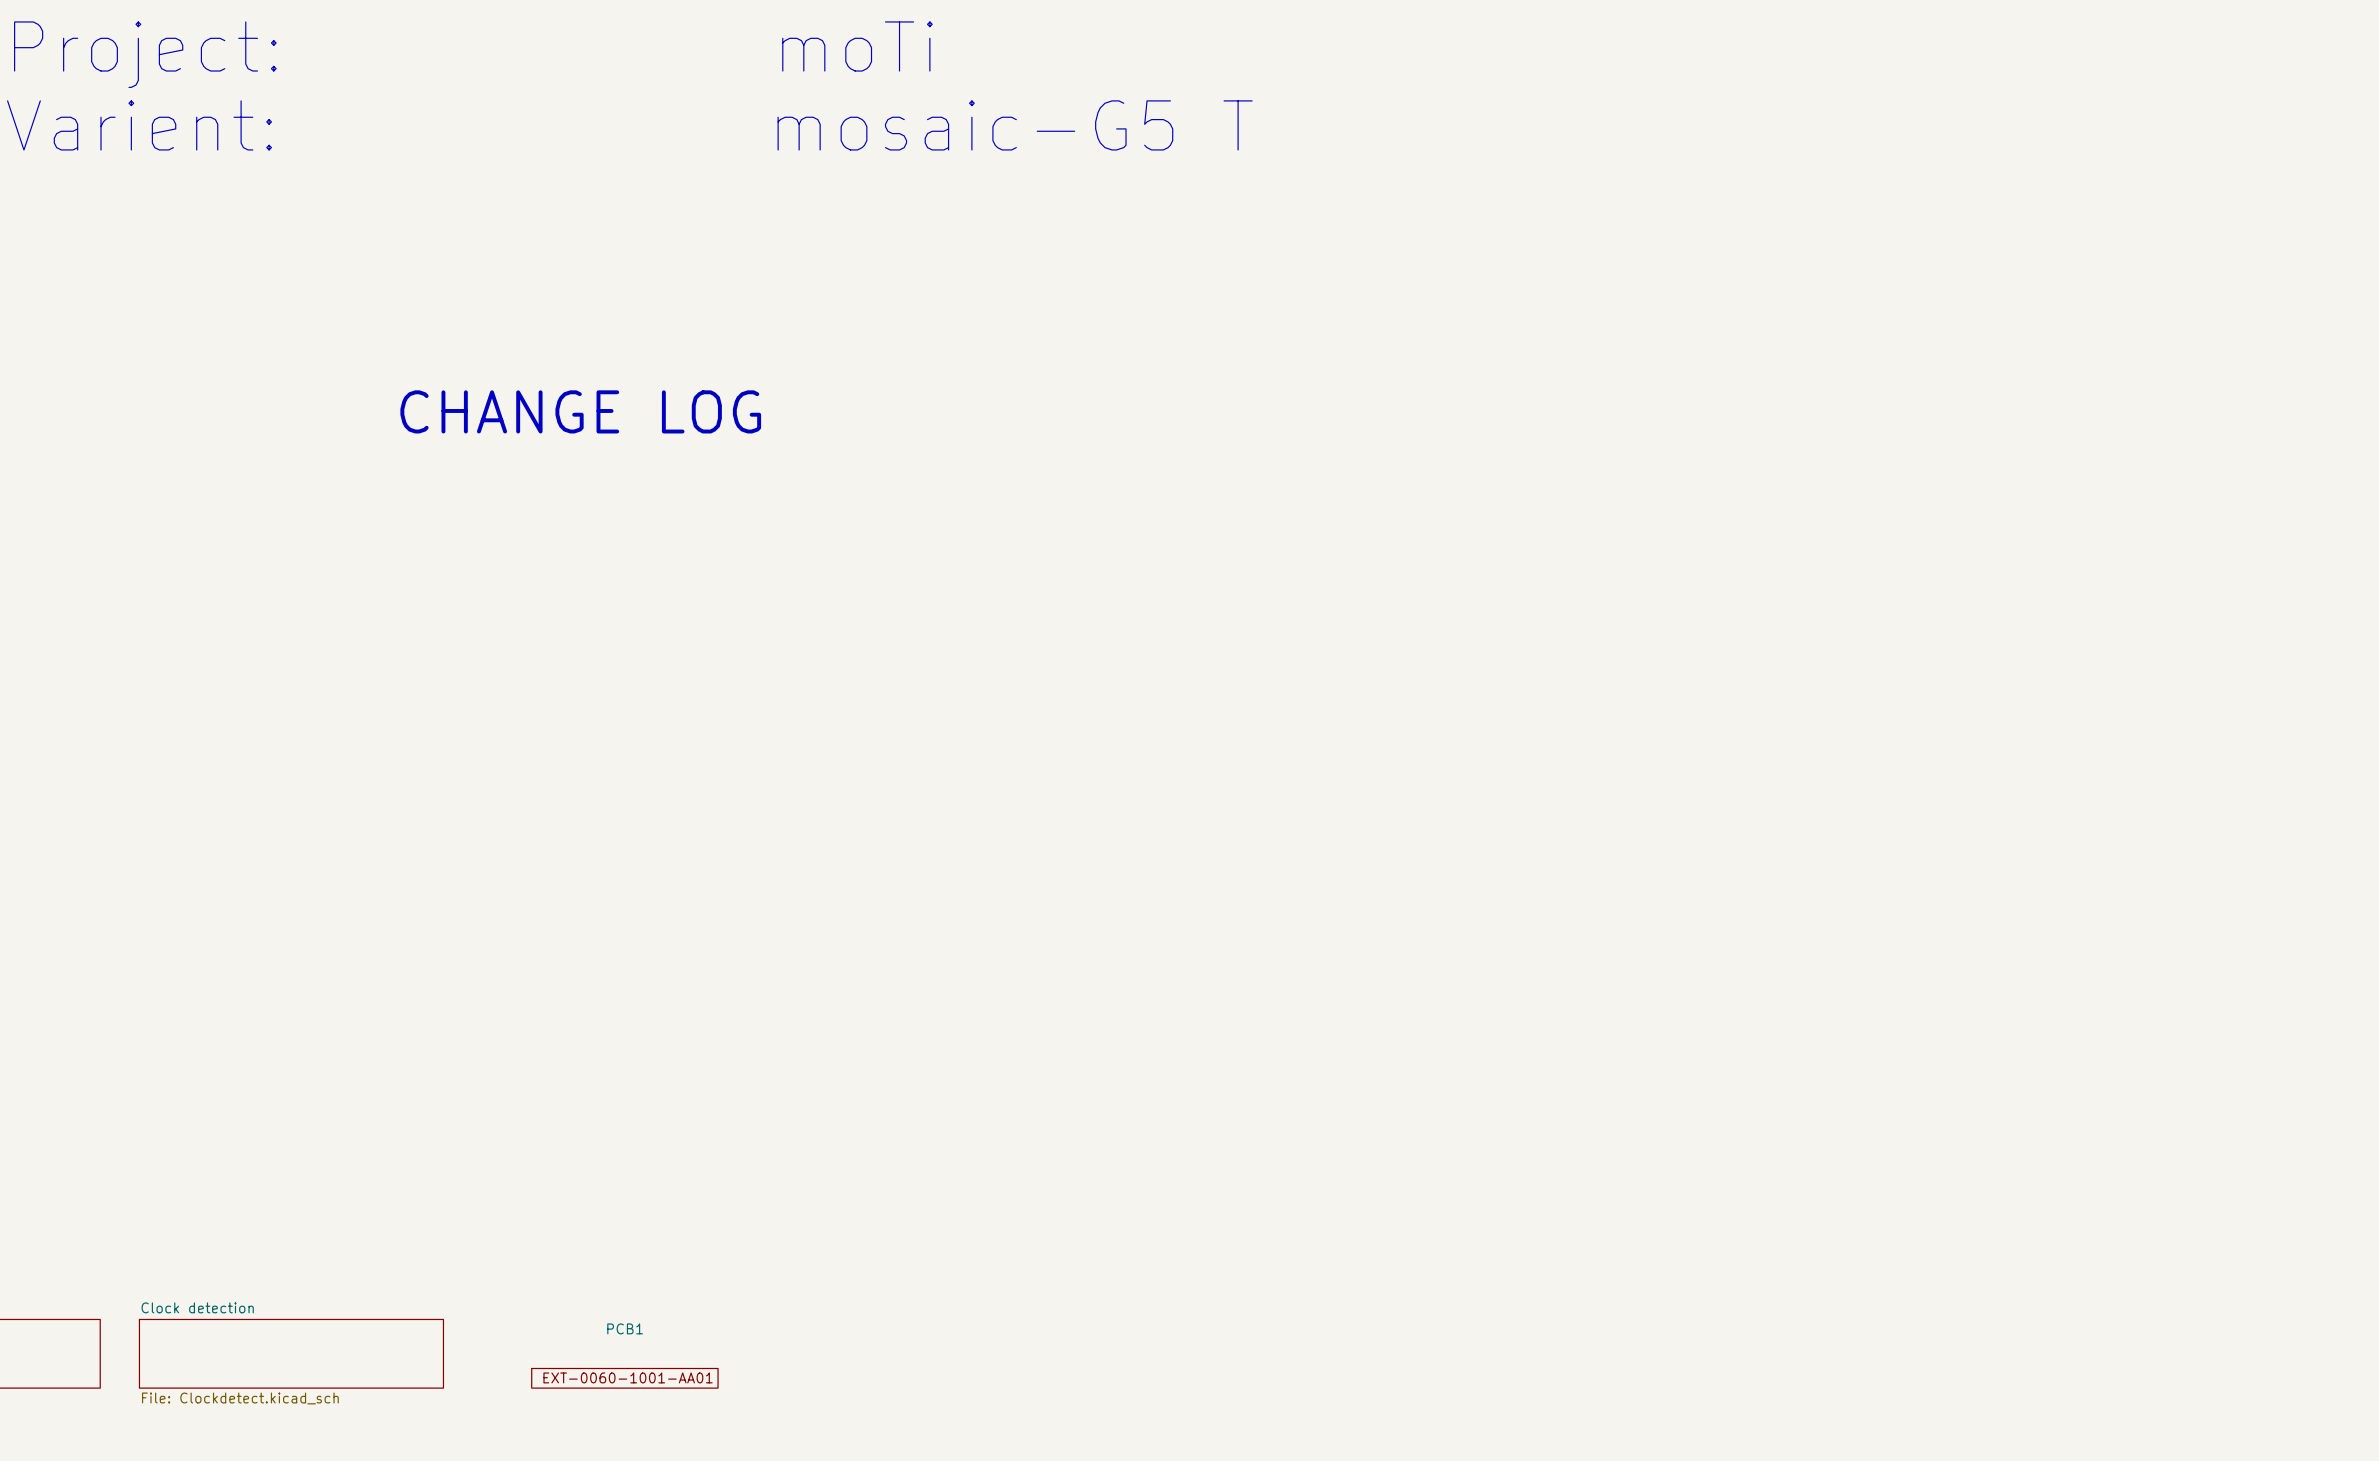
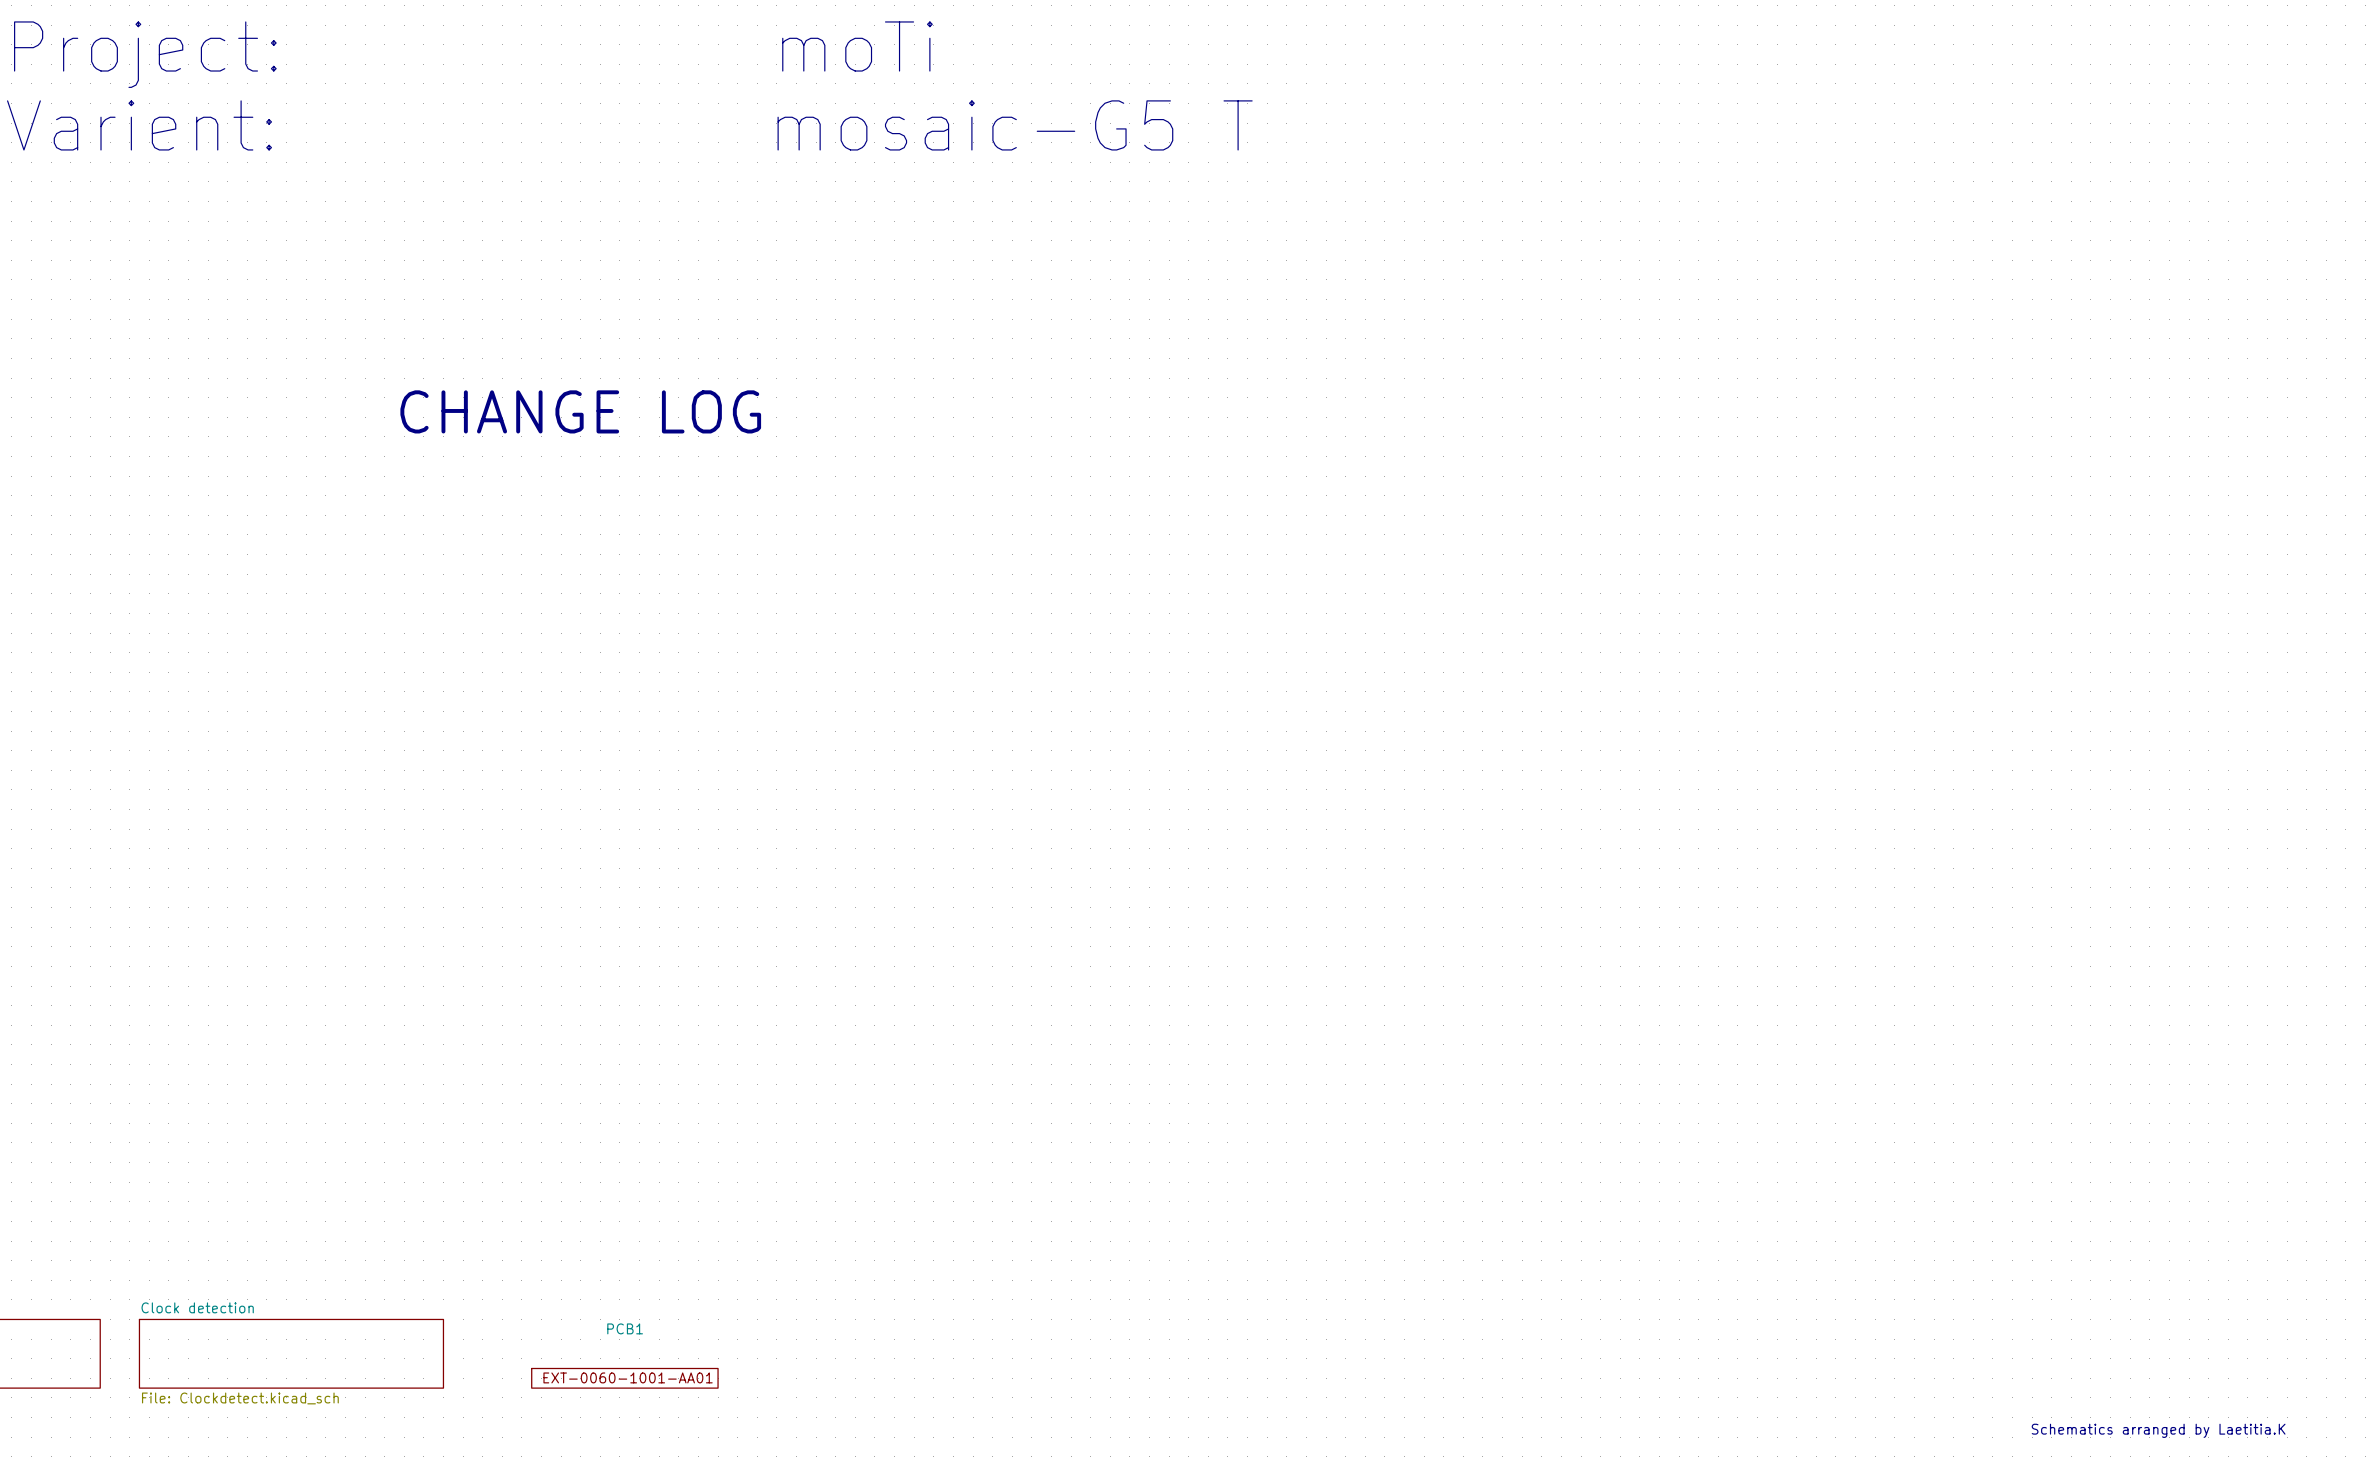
text: none -> Schematics arranged by Laetitia.K (2158, 1430)

